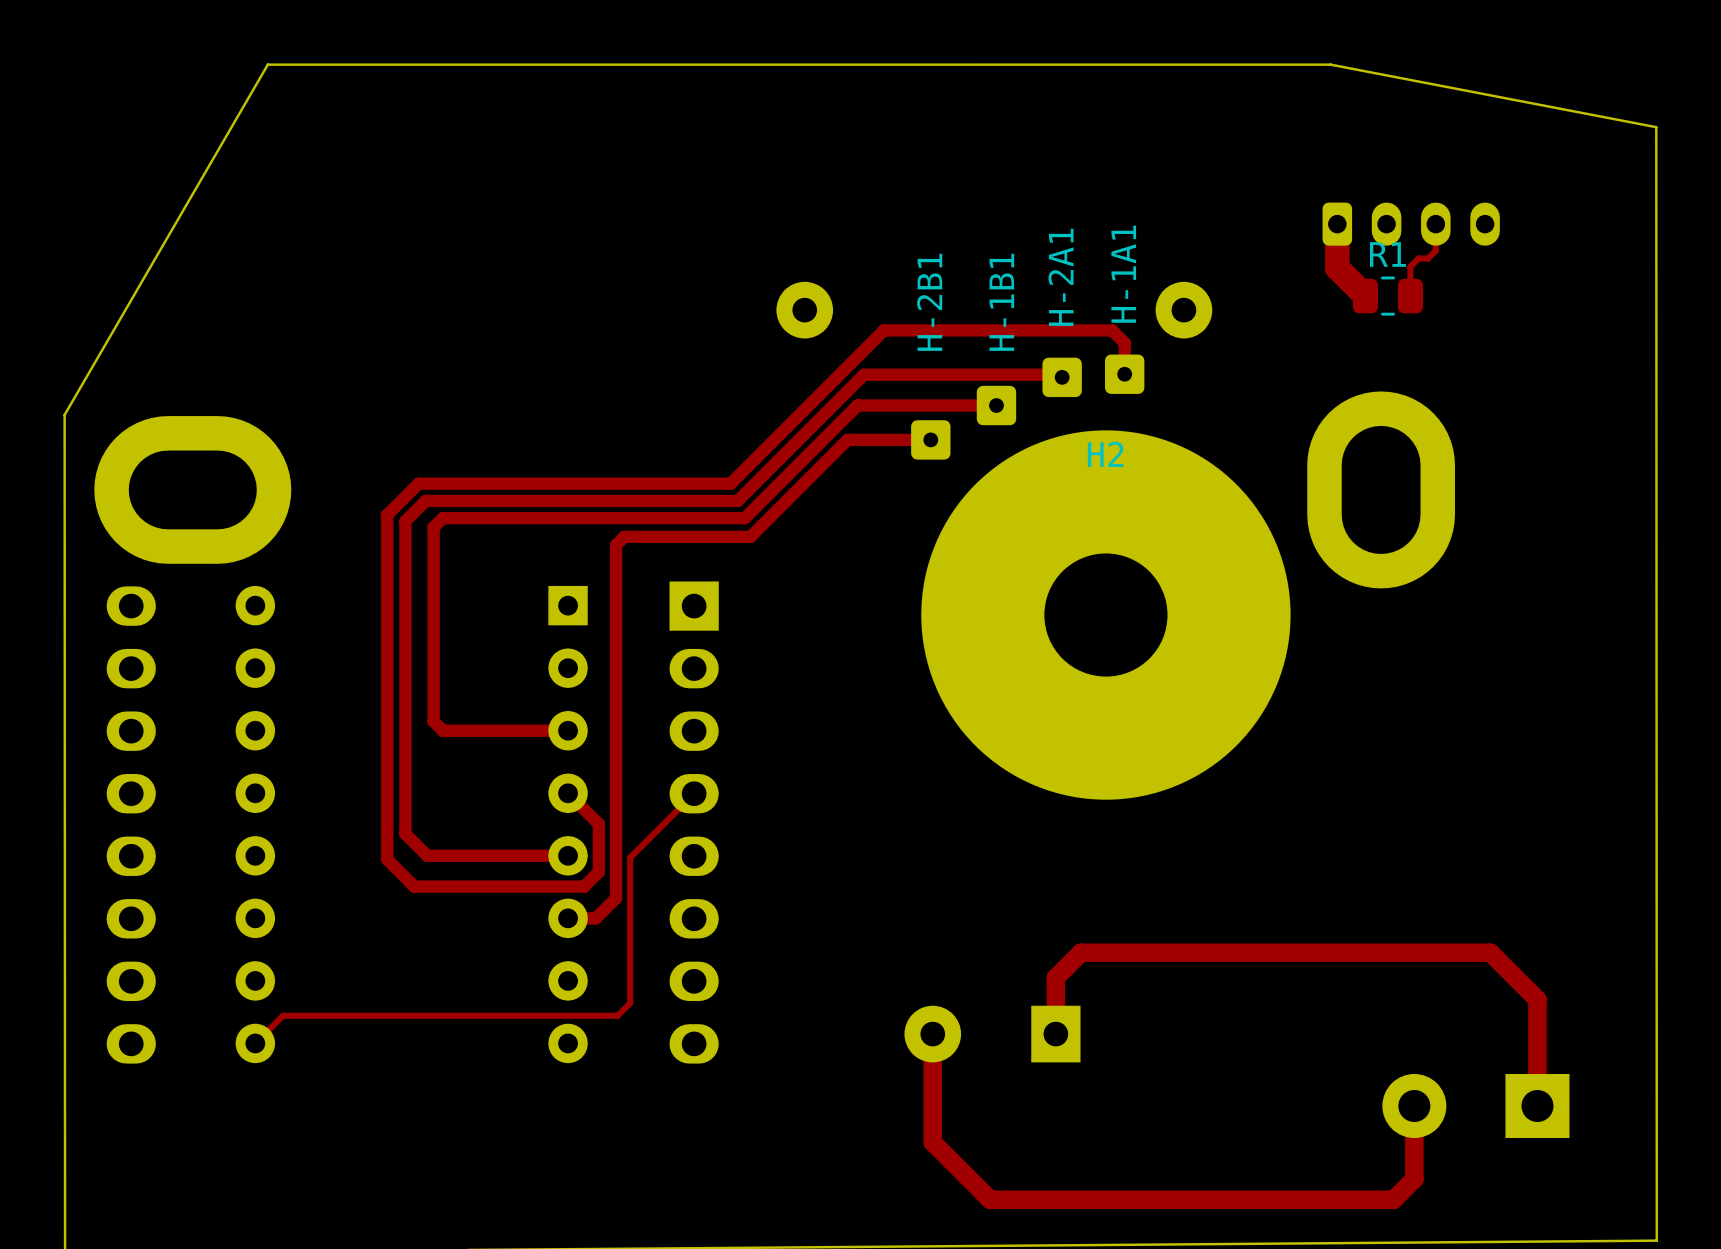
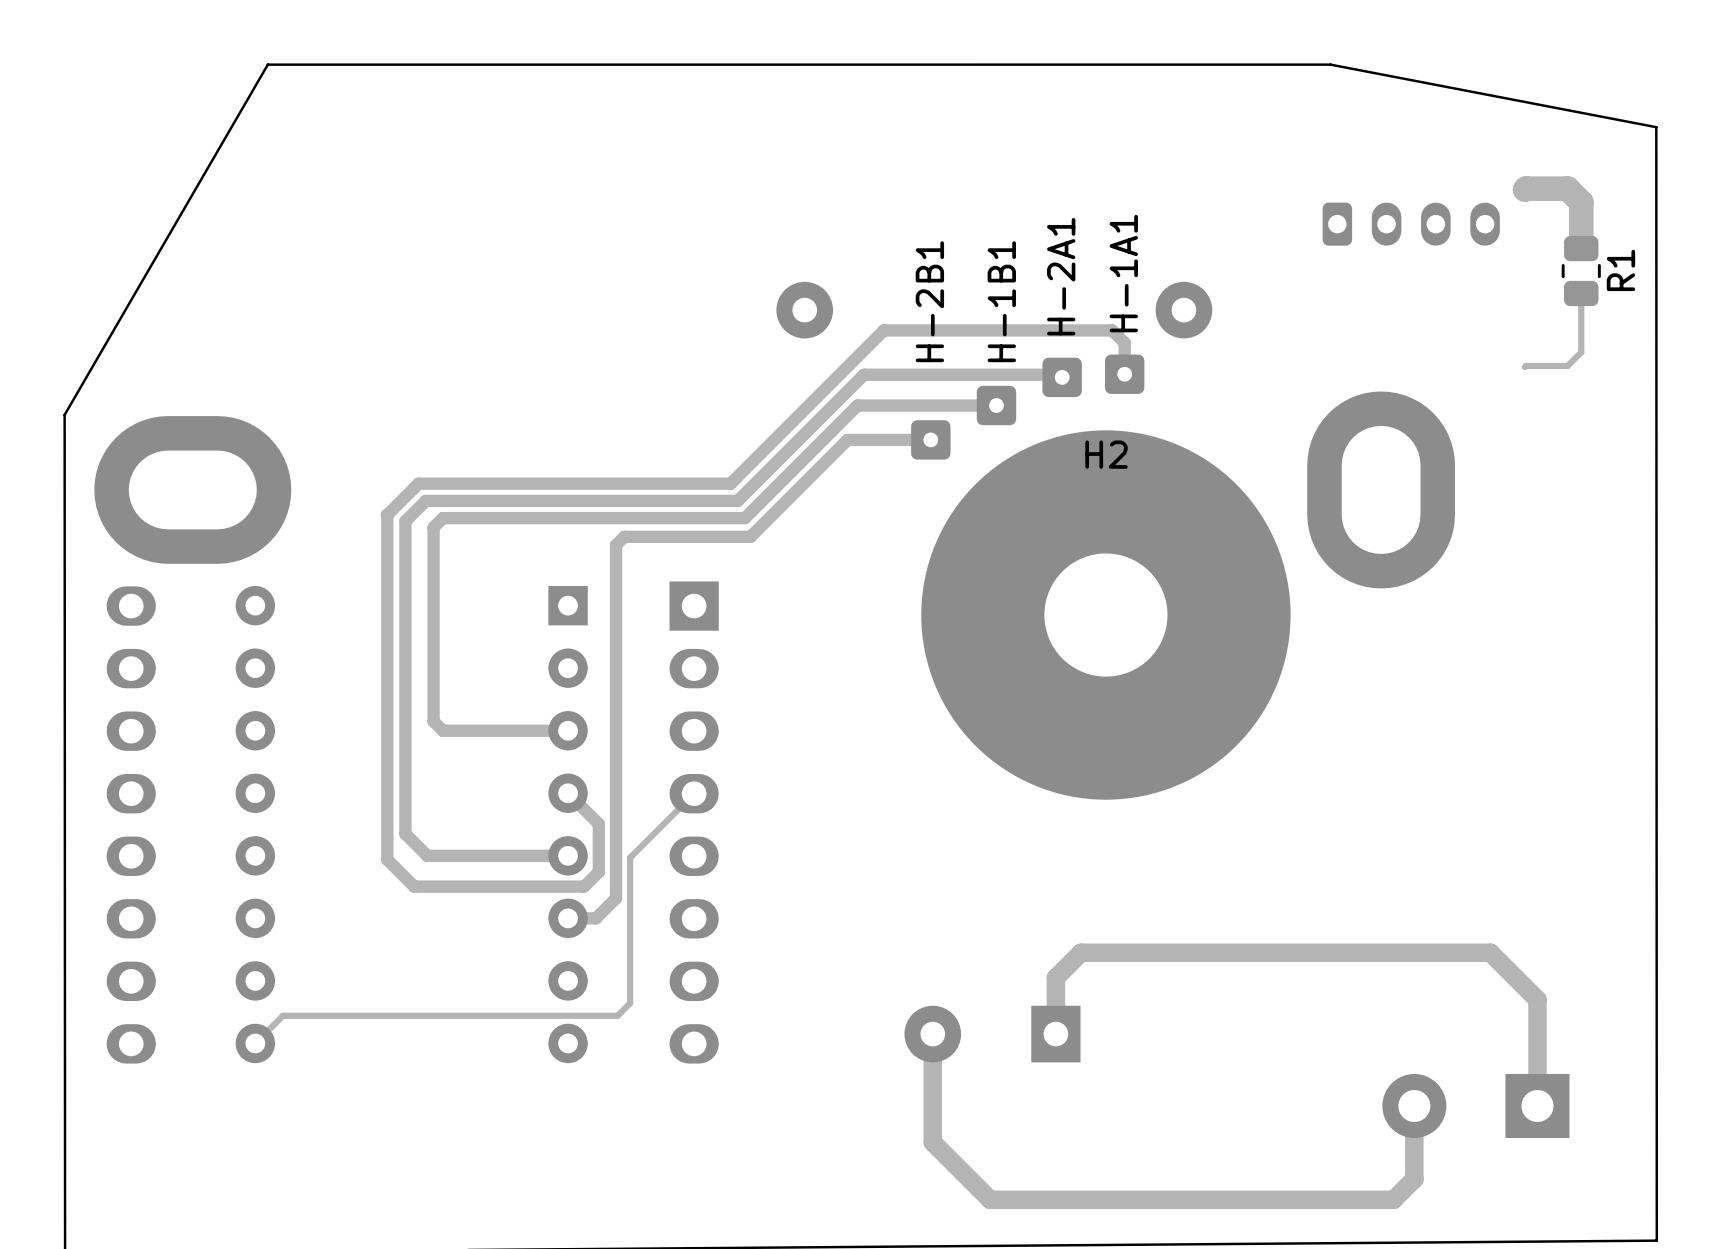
track: none -> (1524, 189) (1567, 188) (1581, 202) (1581, 248)
track: (1337, 224) (1337, 267) (1365, 296) -> none
track: (1435, 224) (1435, 250) (1428, 258) (1418, 258) (1410, 266) (1410, 296) -> none
track: none -> (1581, 293) (1581, 352) (1567, 365) (1524, 367)
R1 rotation: 0° (1387, 296) -> 90° clockwise (1581, 271)
R1 position: (1387, 296) -> (1581, 271)

